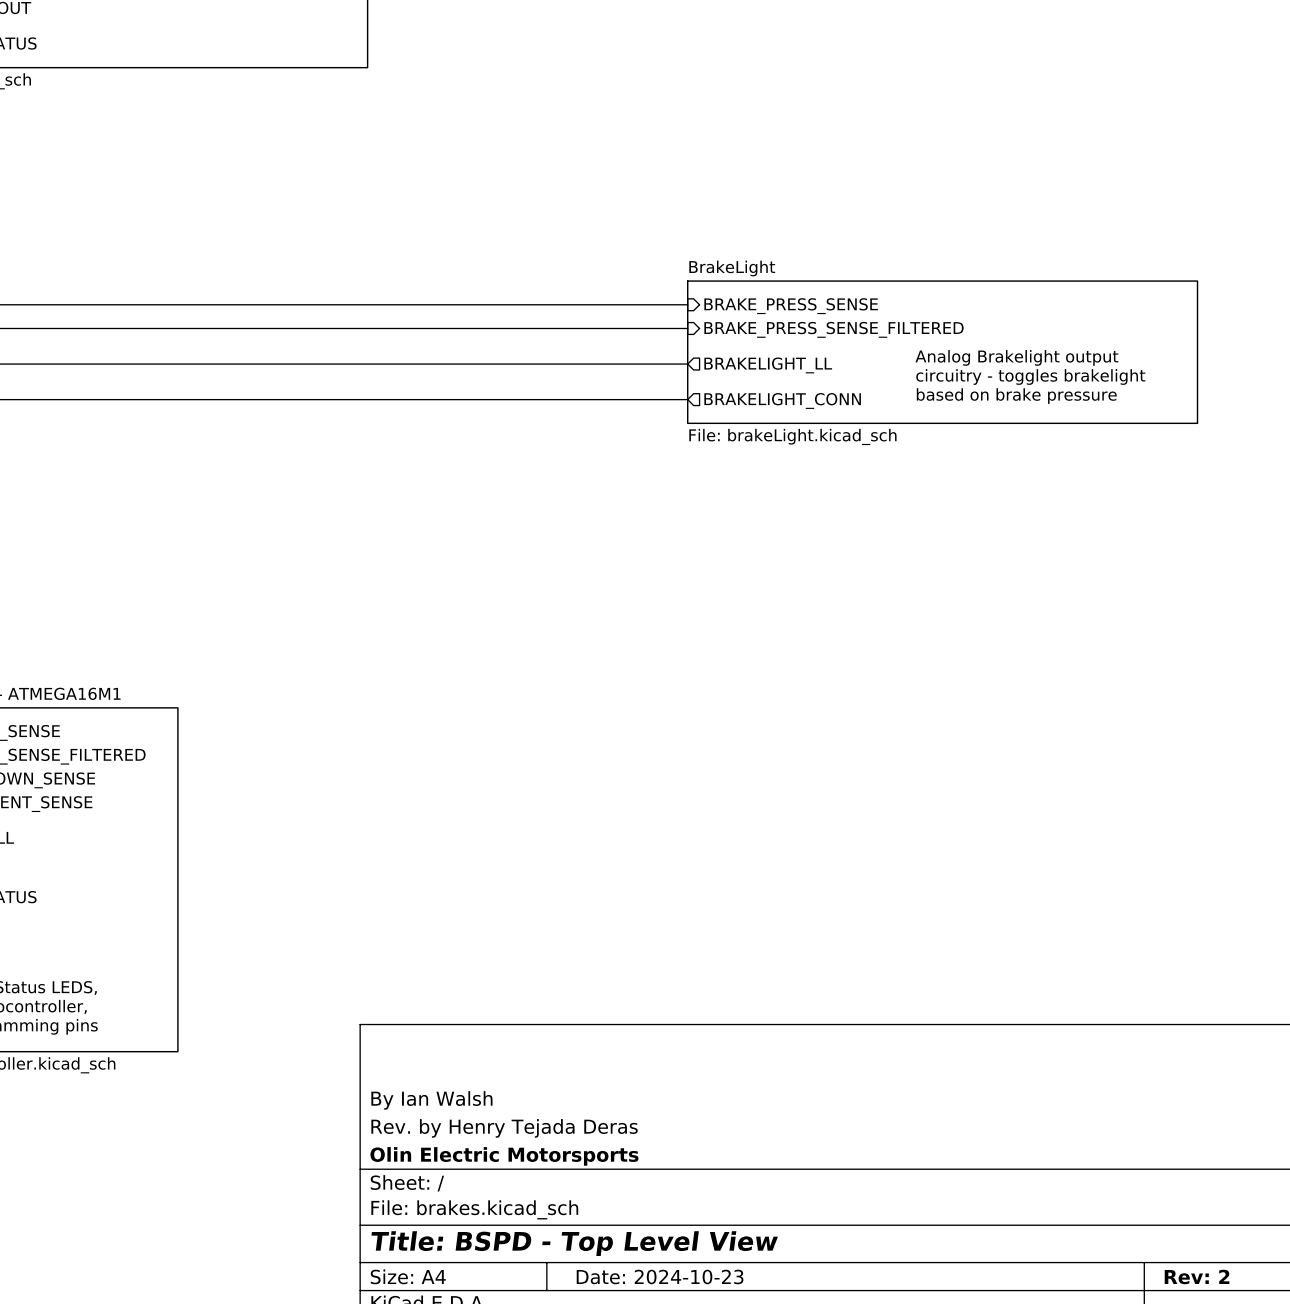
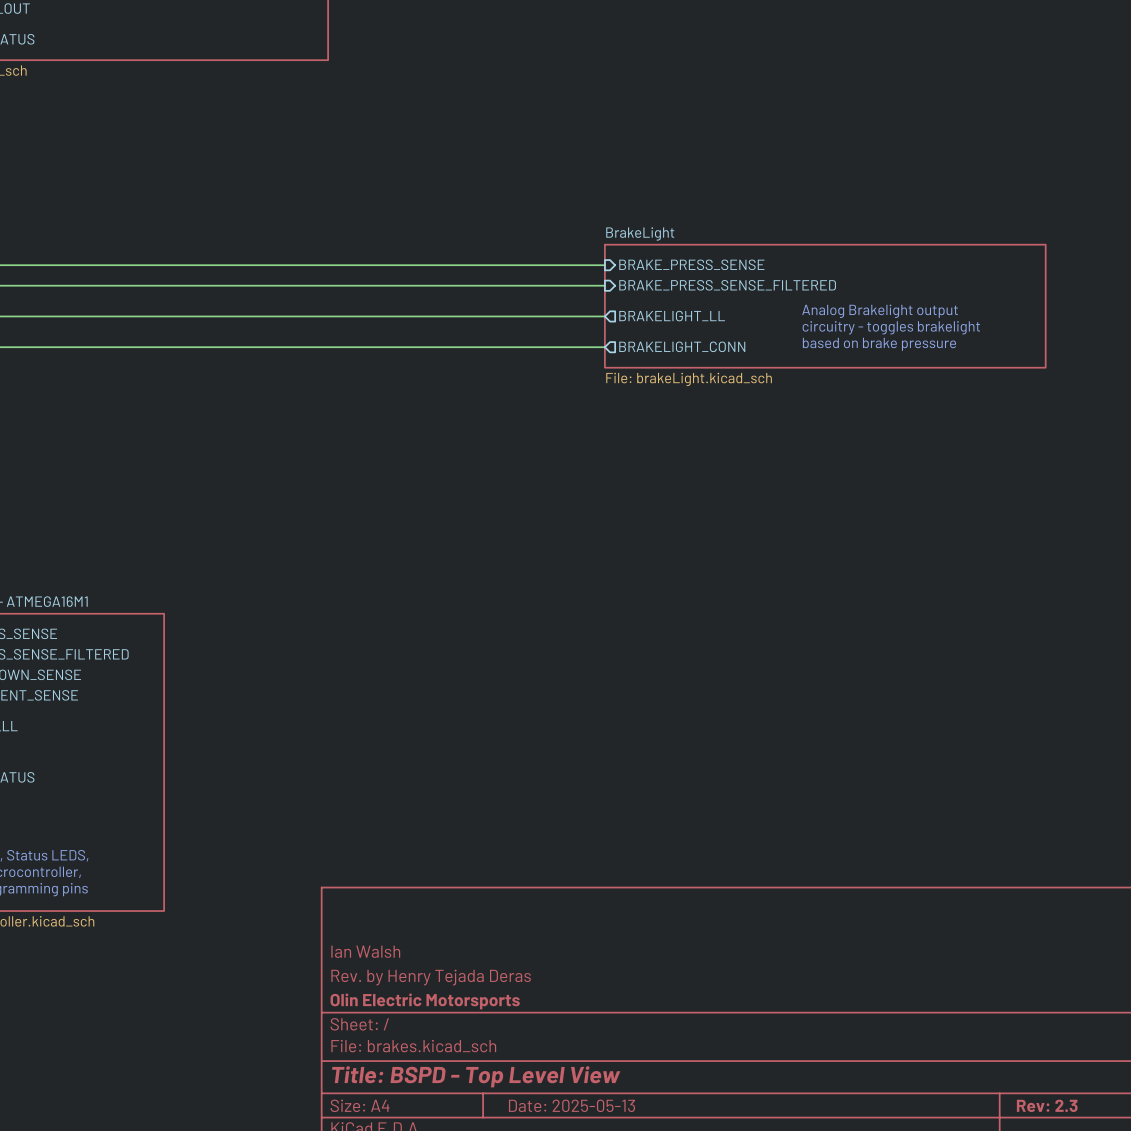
title block: By Ian Walsh (431, 1100) -> Ian Walsh (365, 951)
title block: Date: 2024-10-23 (660, 1276) -> Date: 2025-05-13 (571, 1105)
title block: Rev: 2 (1197, 1276) -> Rev: 2.3 (1047, 1105)

